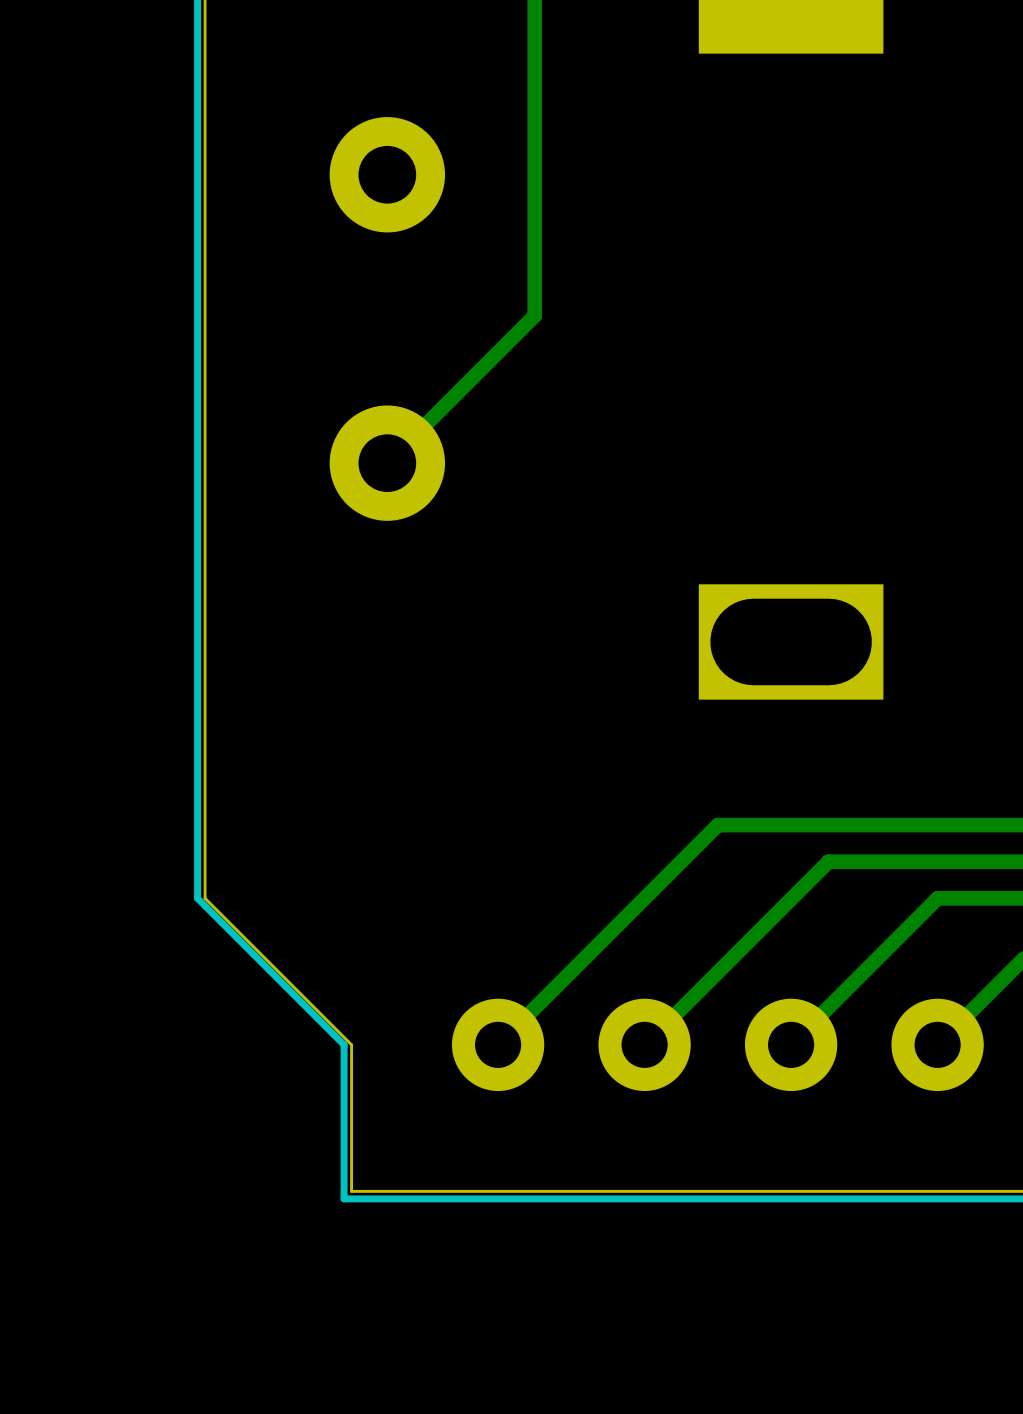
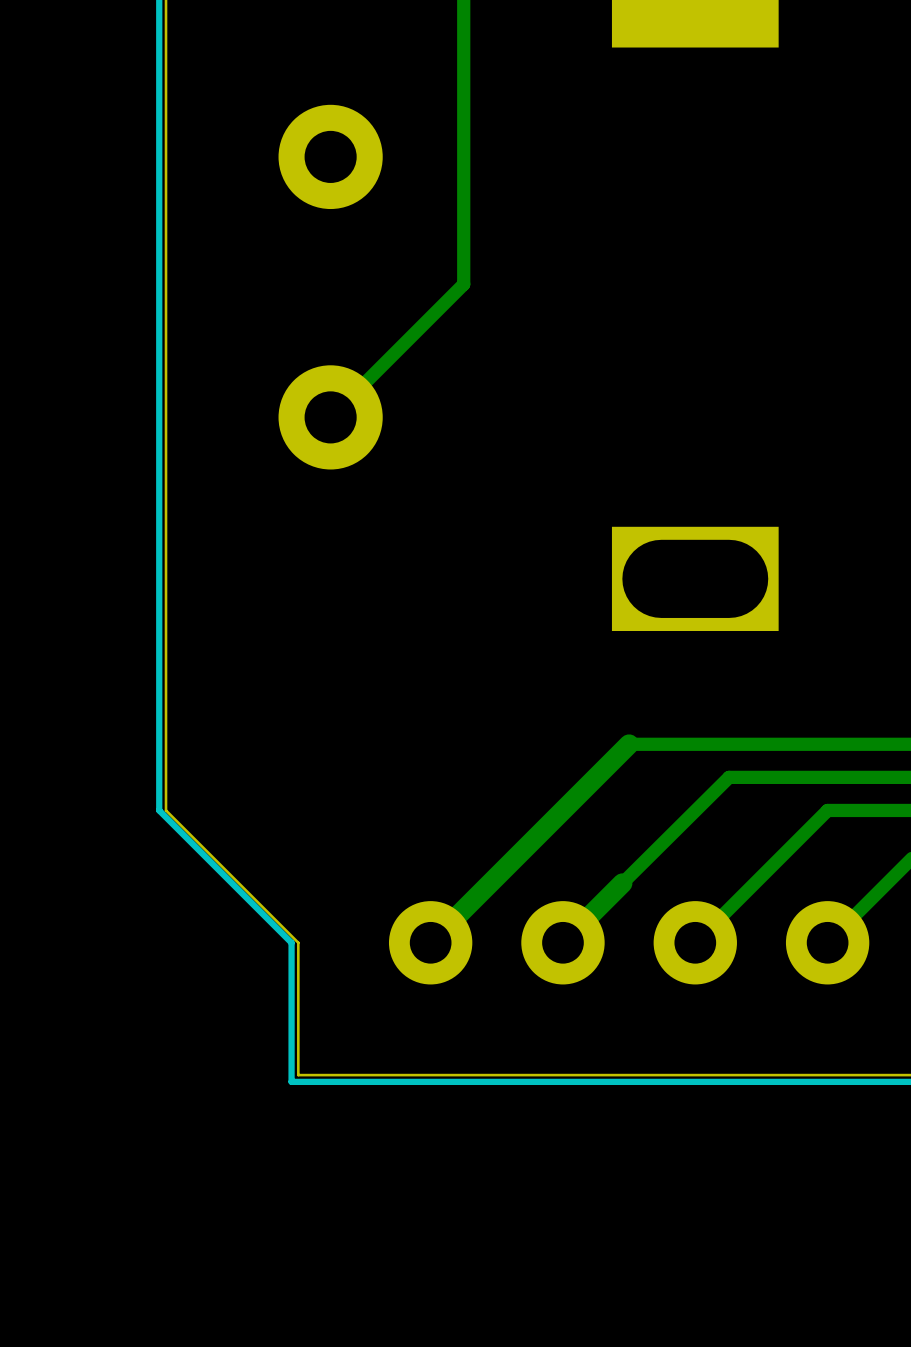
track width: thin (717, 825) (498, 1044) -> thick (629, 744) (430, 942)
track width: thin (828, 861) (645, 1044) -> thick (729, 777) (563, 942)

